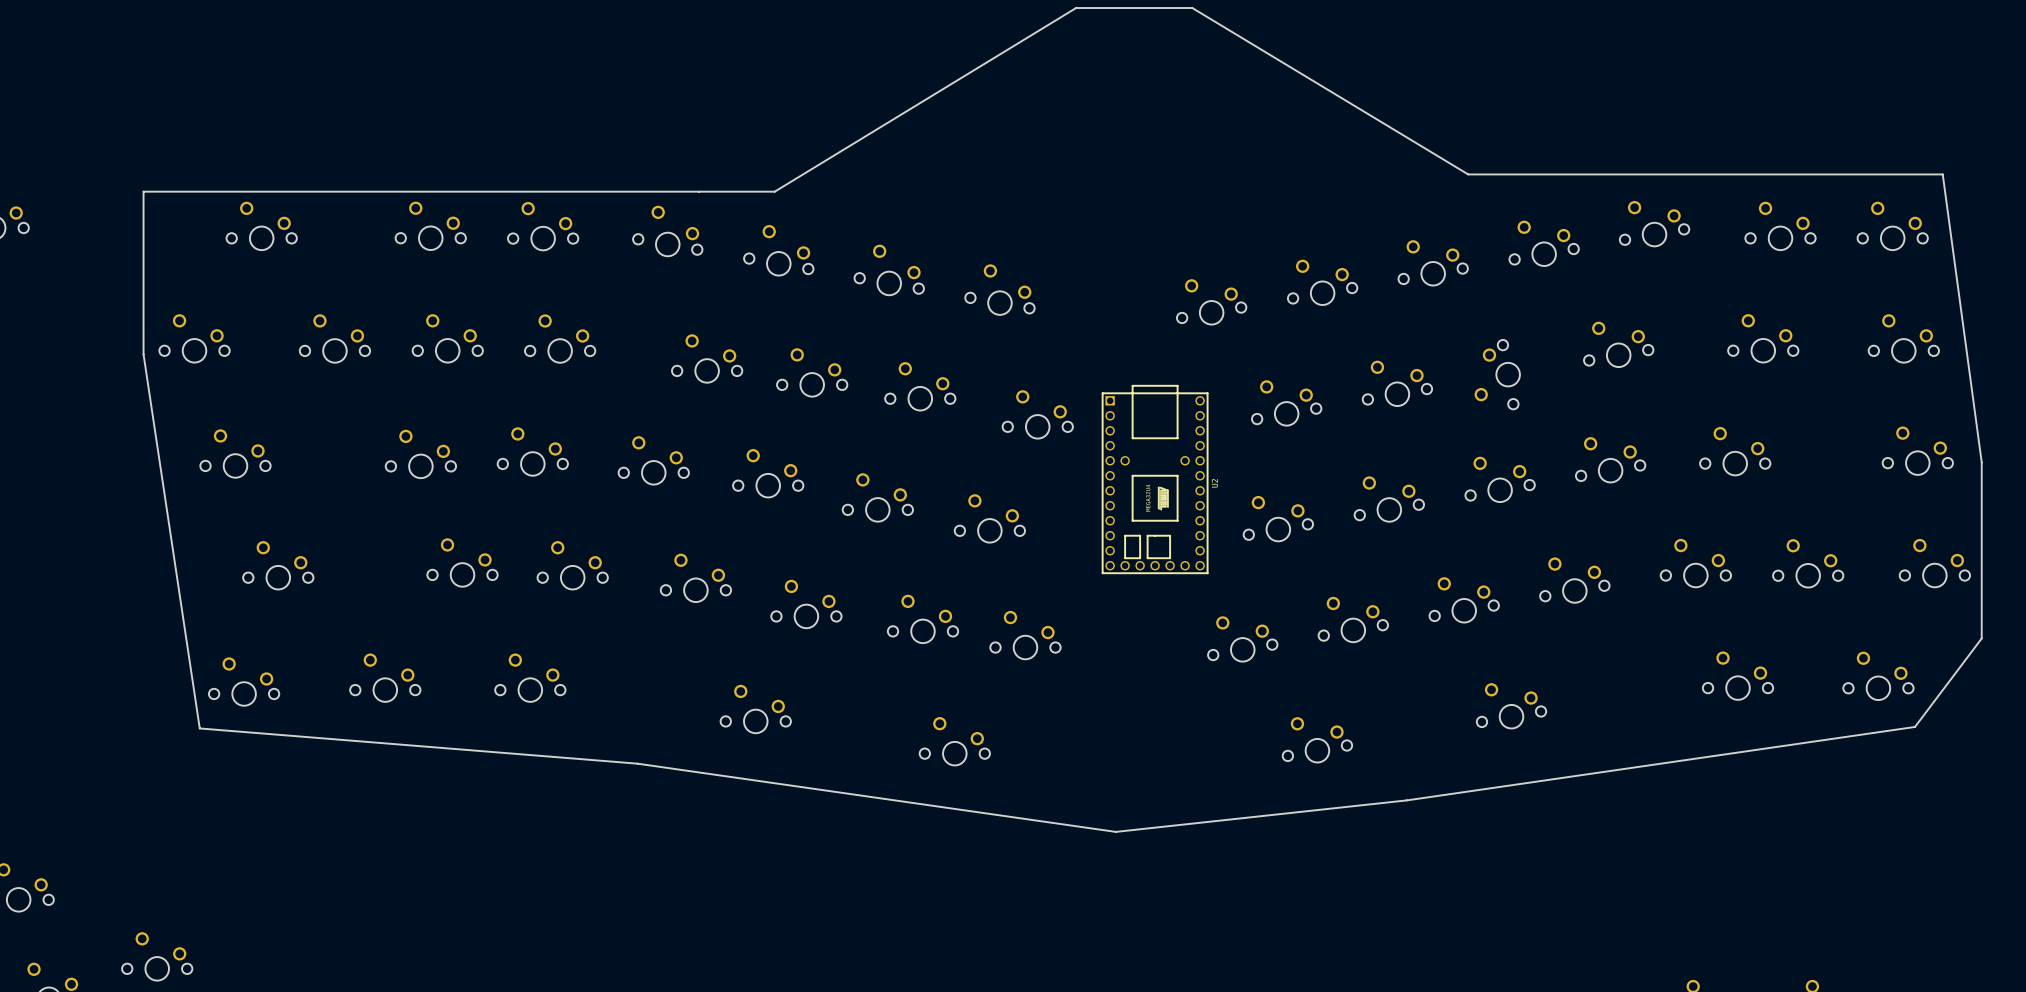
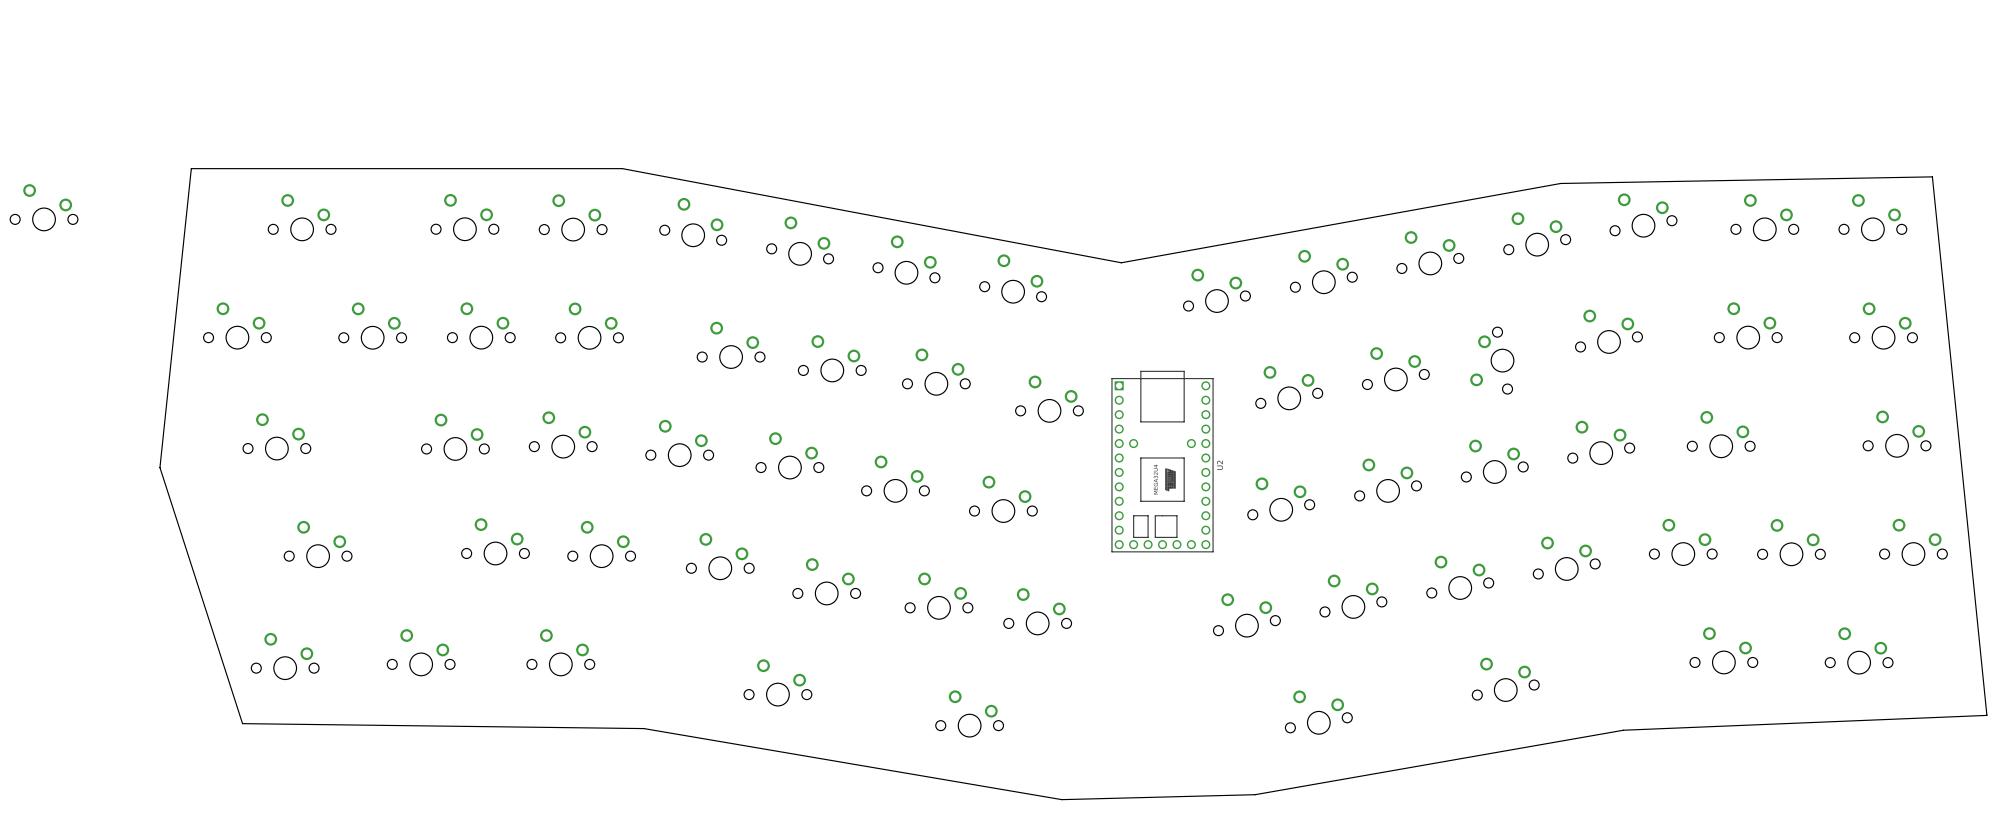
board edge: (1076, 8) (1192, 8) (1468, 174) (1942, 174) (1981, 462) (1981, 638) (1915, 726) (1406, 800) (1115, 831) (637, 763) (199, 728) (143, 354) (143, 191) (774, 191) (1076, 8) -> (191, 168) (159, 467) (242, 723) (643, 728) (1061, 799) (1255, 794) (1623, 730) (1986, 715) (1932, 176) (1560, 183) (1121, 262) (622, 168) (191, 168)

